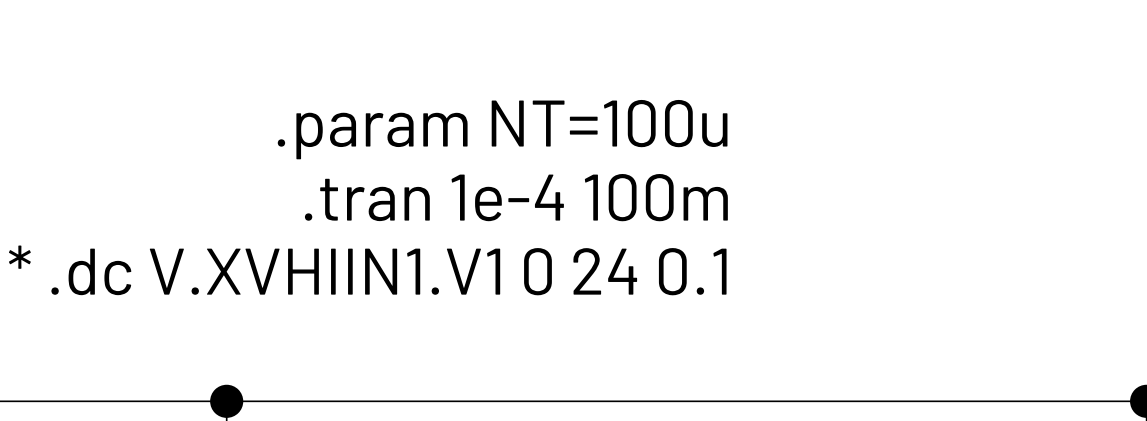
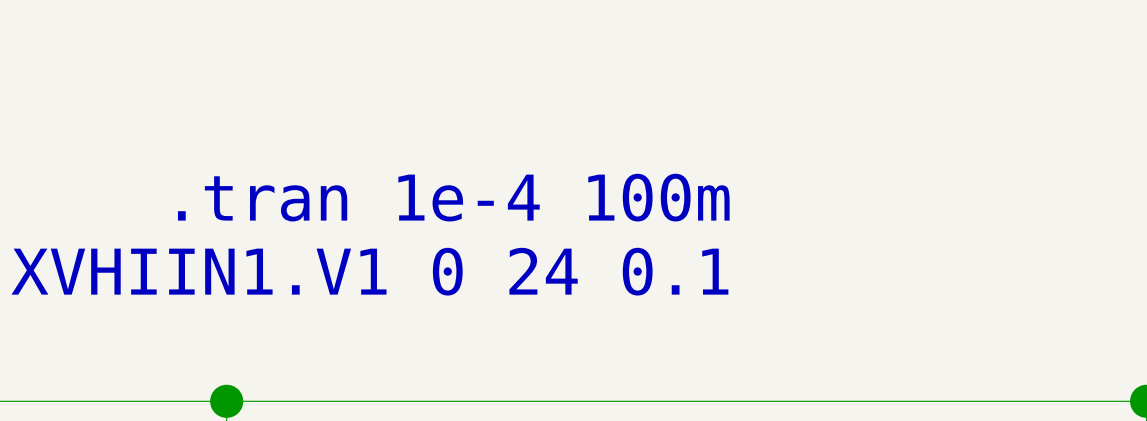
text: .param NT=100u (502, 129) -> none

